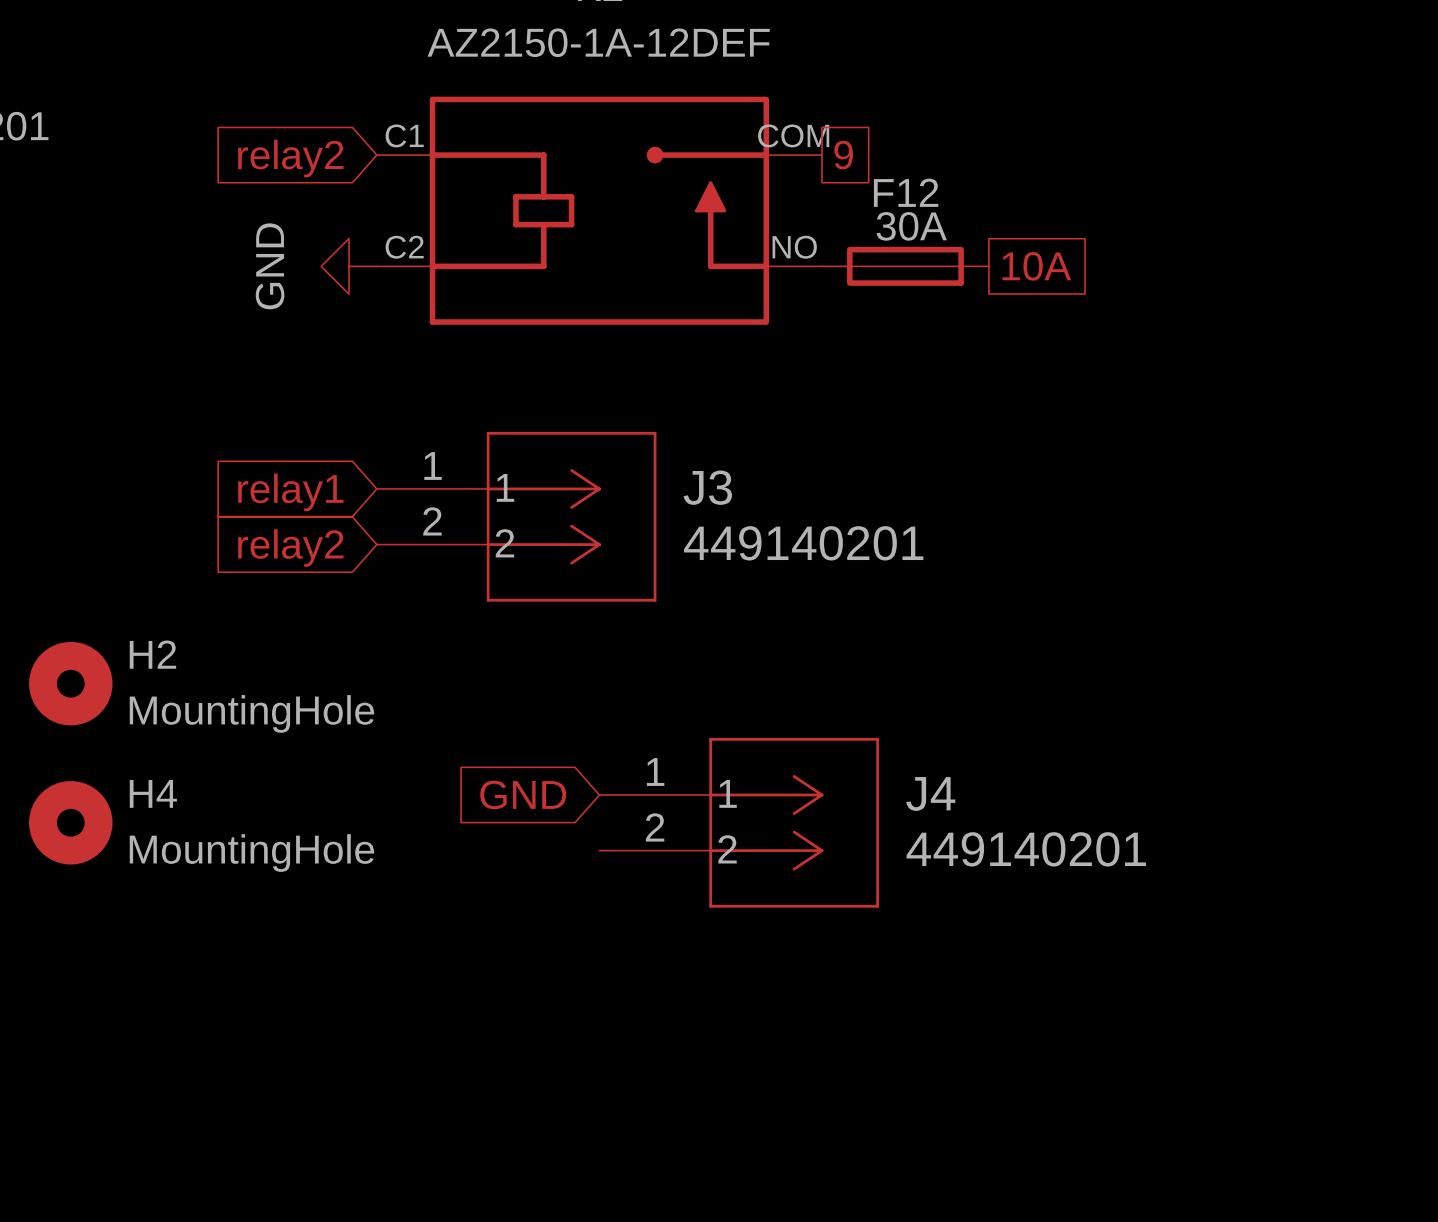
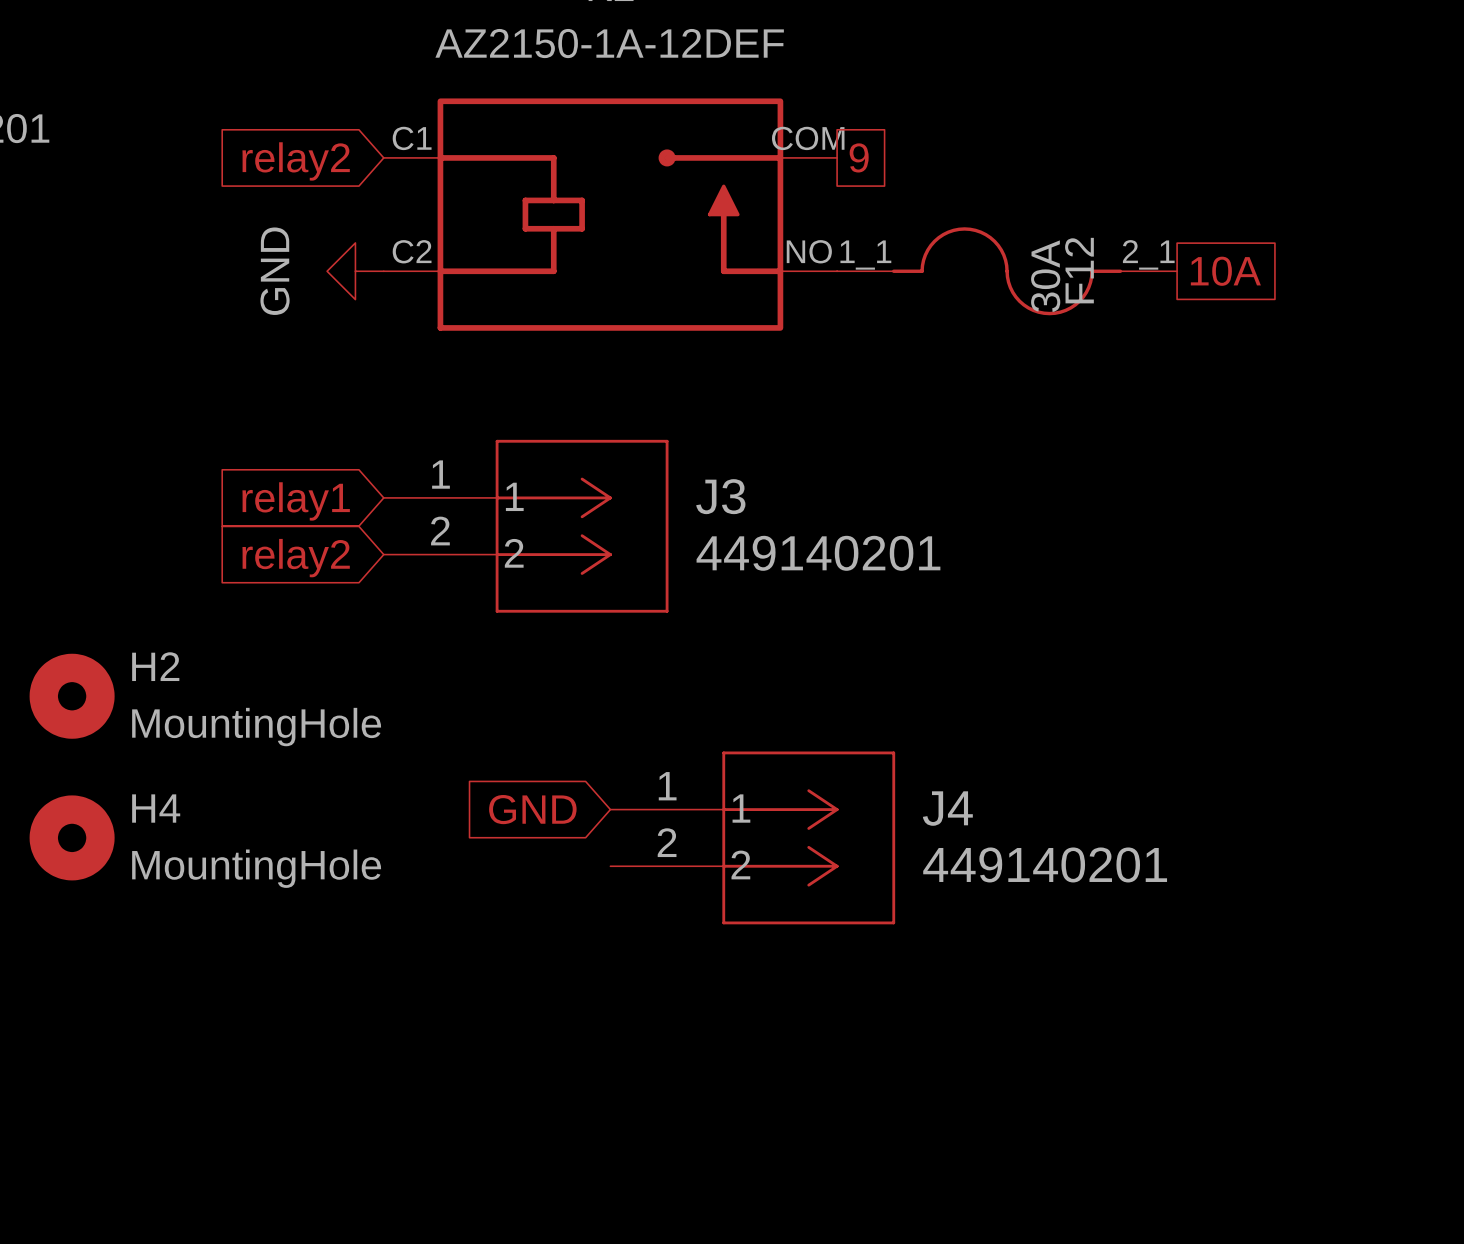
F12 name position: F12 (906, 192) -> F12 (1079, 270)
F12 value position: 30A (911, 226) -> 30A (1045, 276)
F12 symbol: [821, 246, 989, 286] -> [837, 227, 1178, 316]
global label position: 10A (1036, 266) -> 10A (1225, 271)

